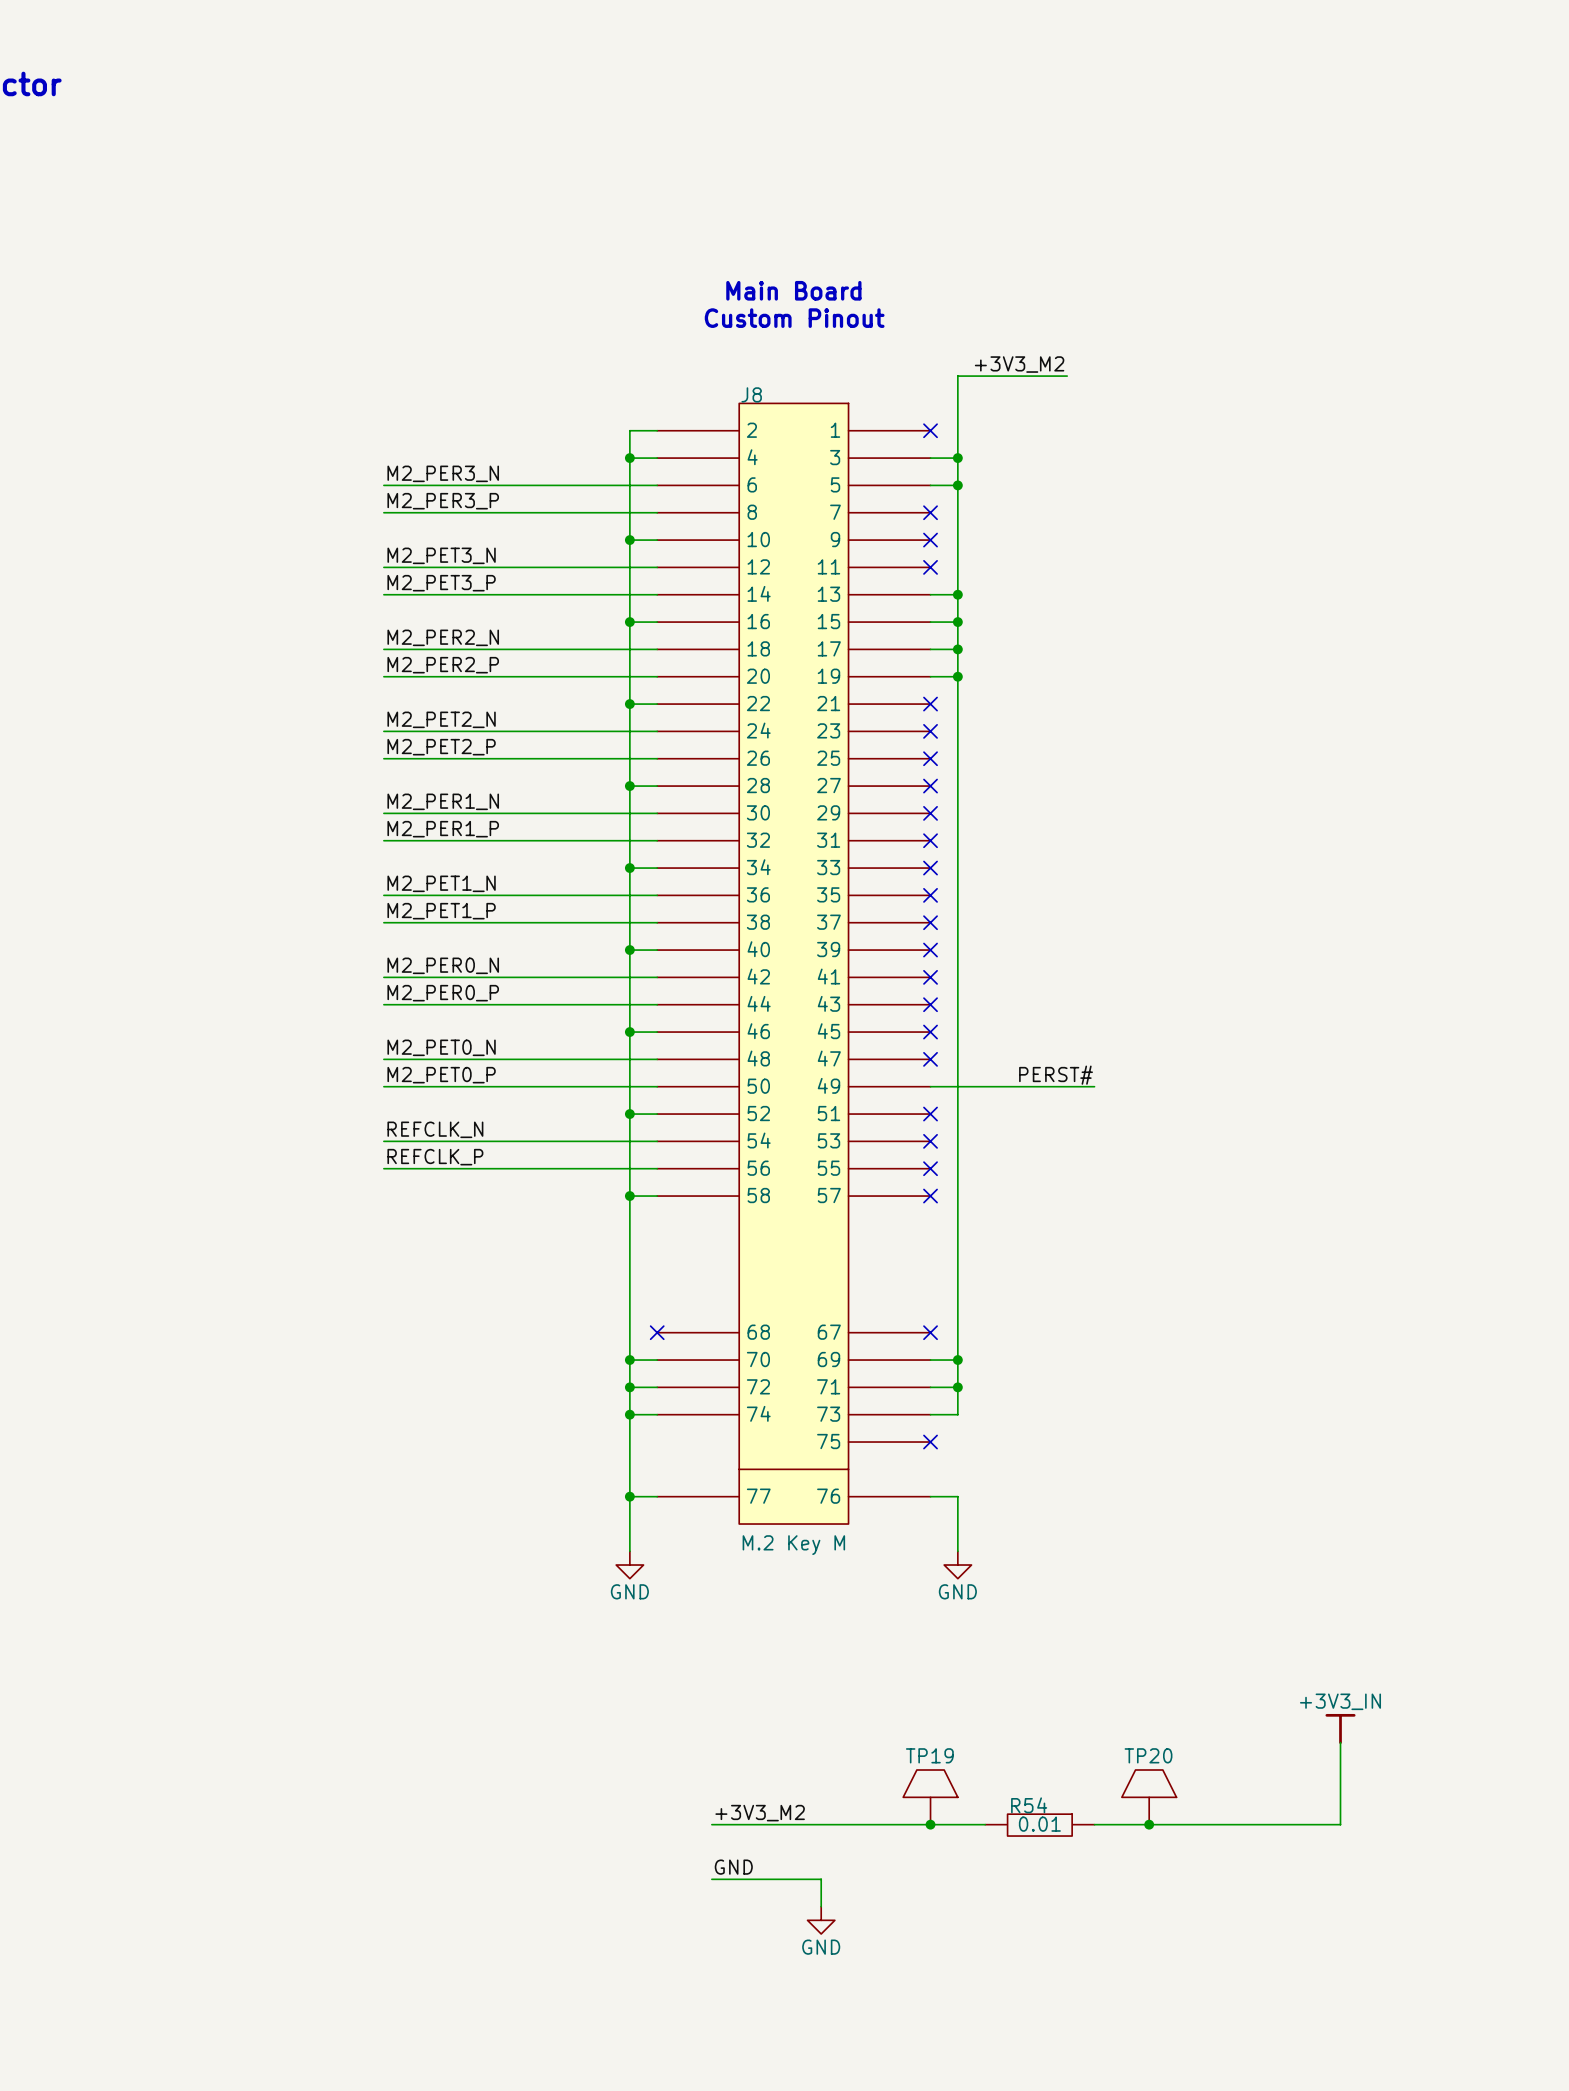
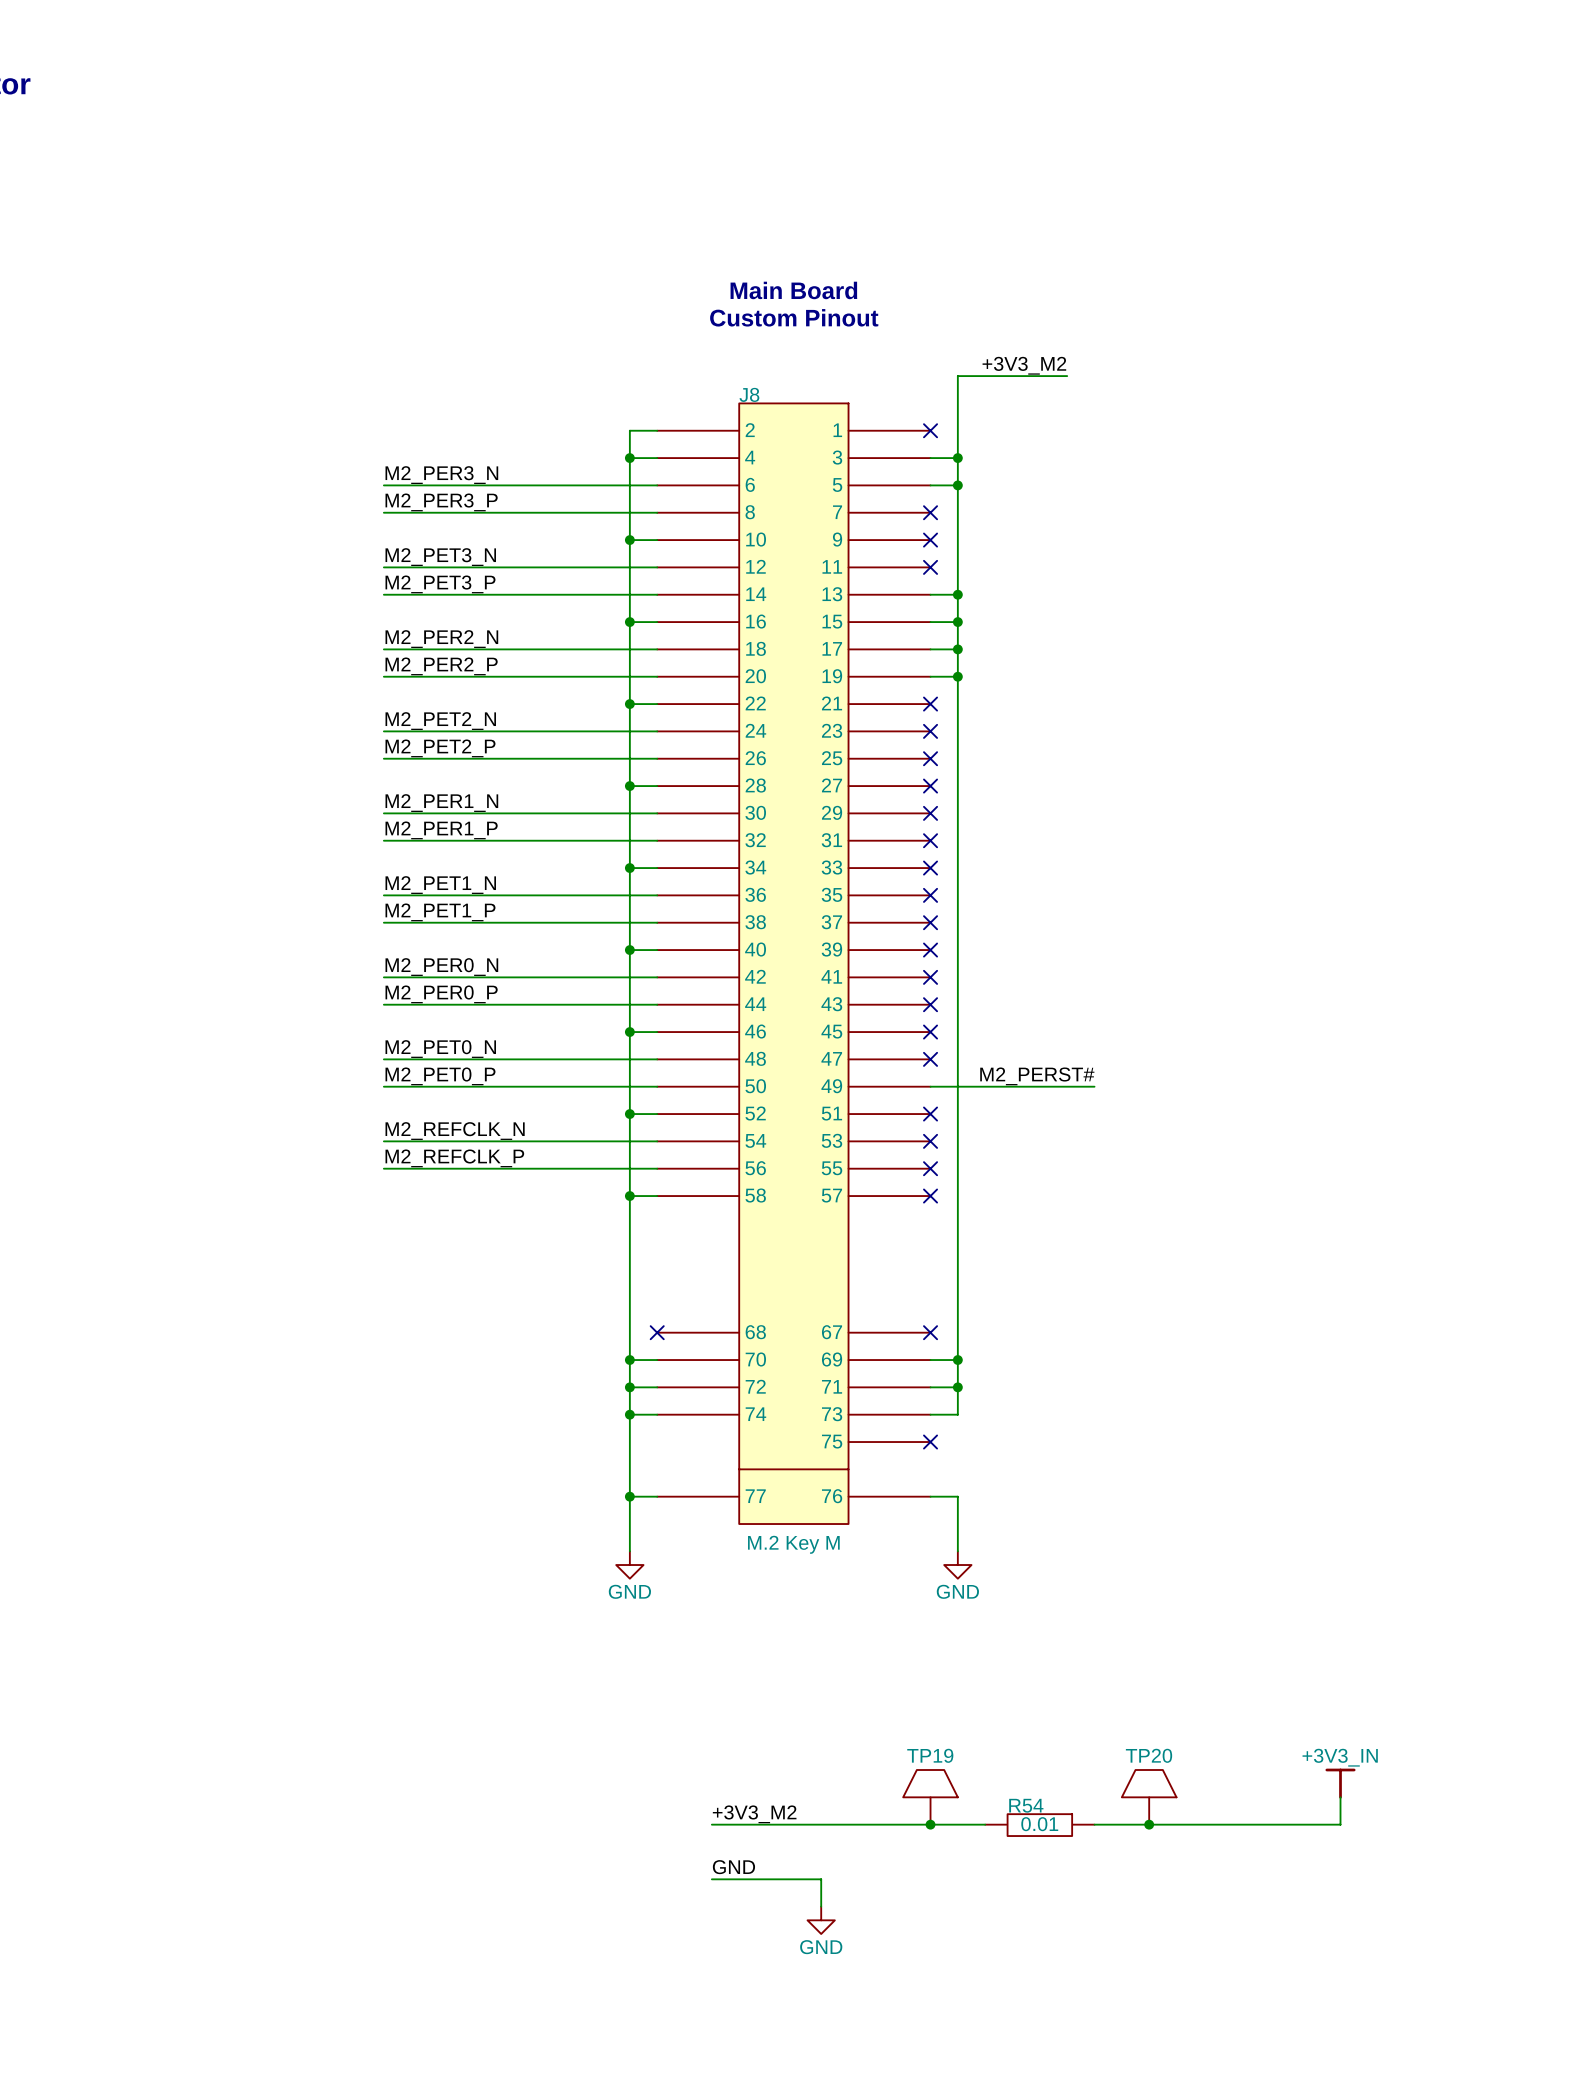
label: PERST# (1056, 1075) -> M2_PERST# (1037, 1076)
label: REFCLK_N (435, 1129) -> M2_REFCLK_N (455, 1131)
label: REFCLK_P (435, 1157) -> M2_REFCLK_P (454, 1158)
power symbol position: +3V3_IN (1340, 1729) -> +3V3_IN (1340, 1783)

